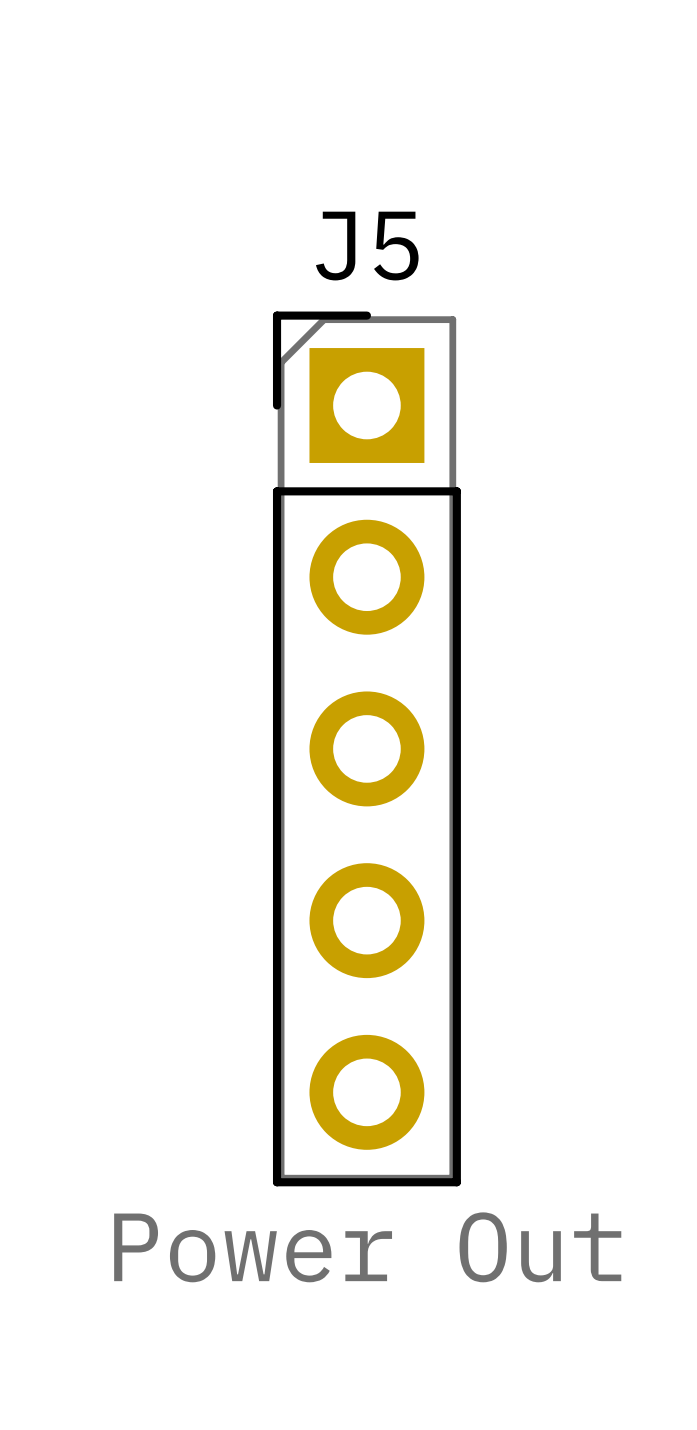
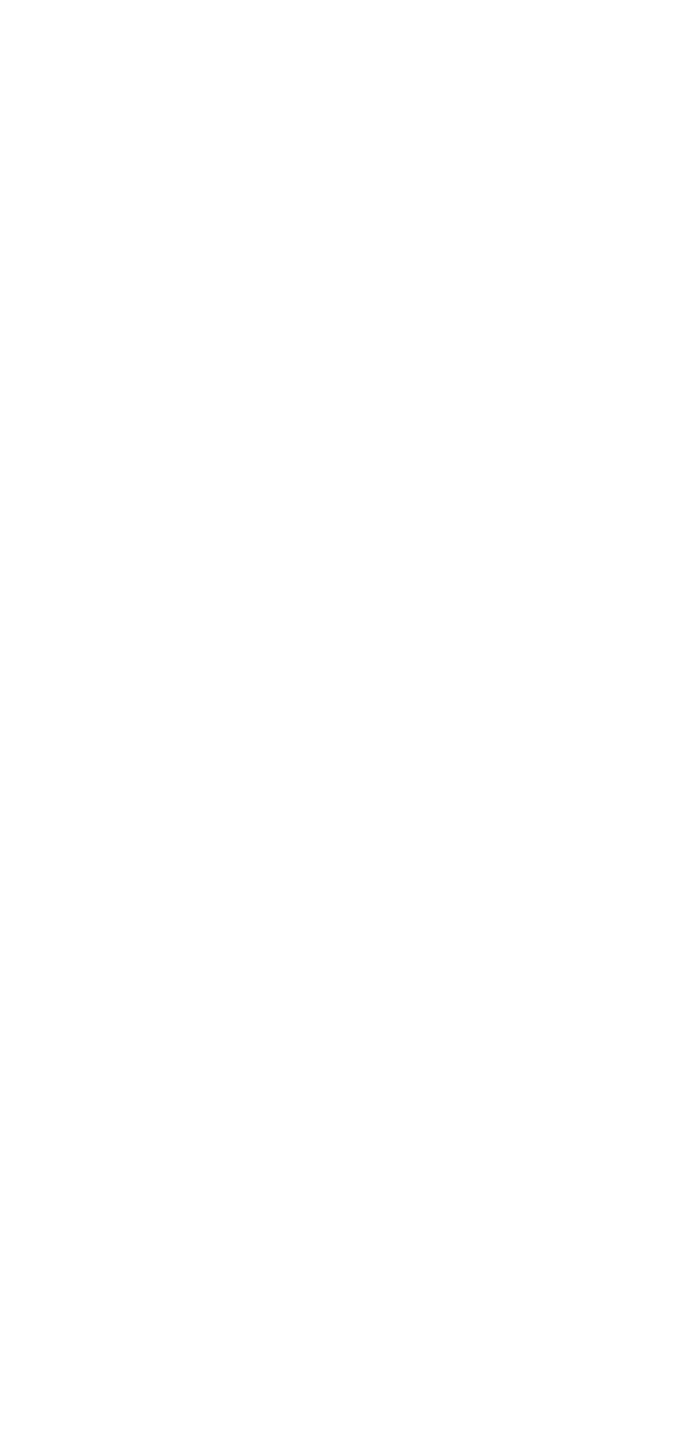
J5: Power Out (366, 748) -> none

